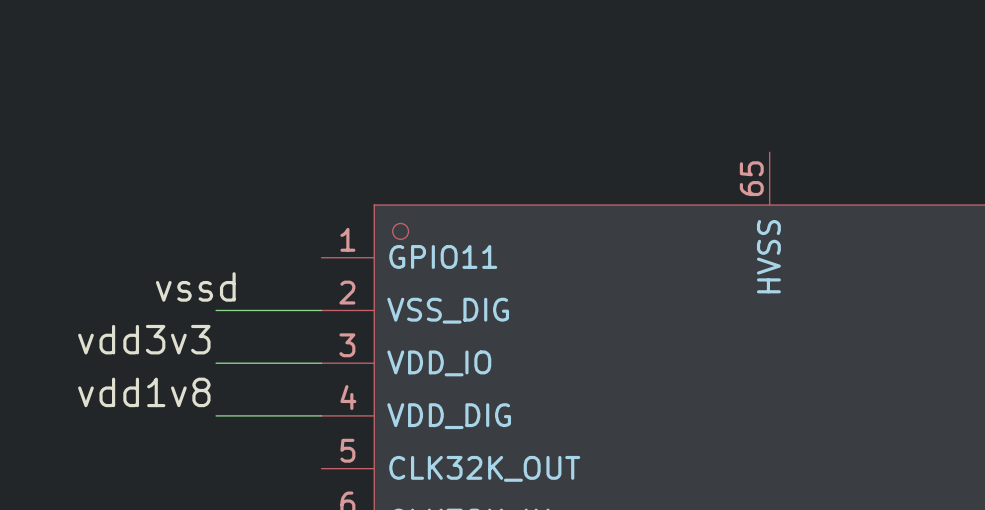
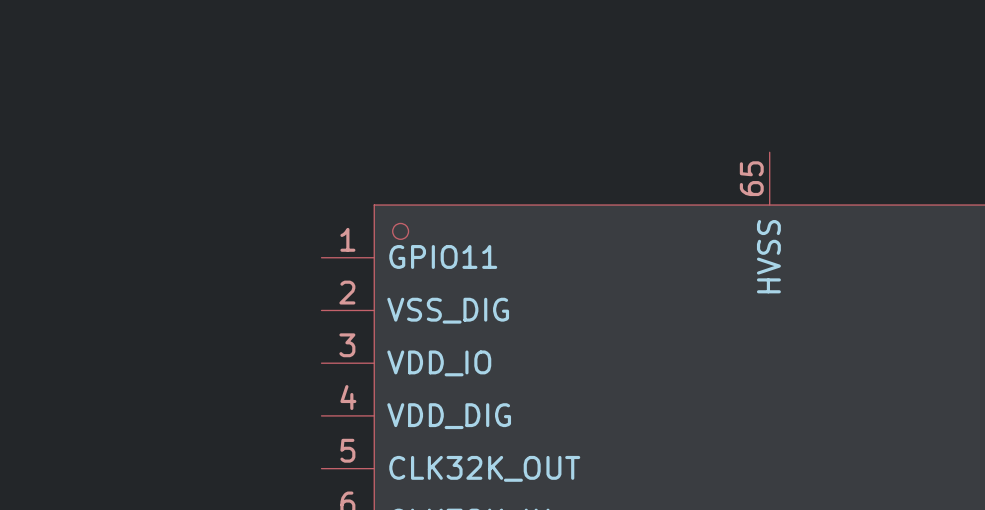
label: vssd (195, 286) -> none
wire: (216, 310) (321, 310) -> none
label: vdd3v3 (144, 339) -> none
wire: (216, 363) (321, 363) -> none
label: vdd1v8 (144, 392) -> none
wire: (216, 415) (321, 415) -> none

